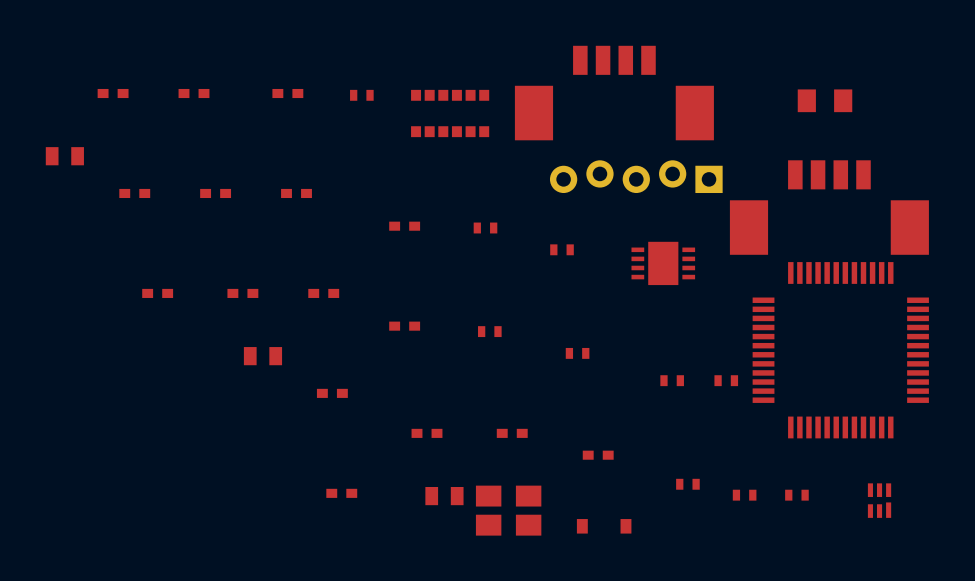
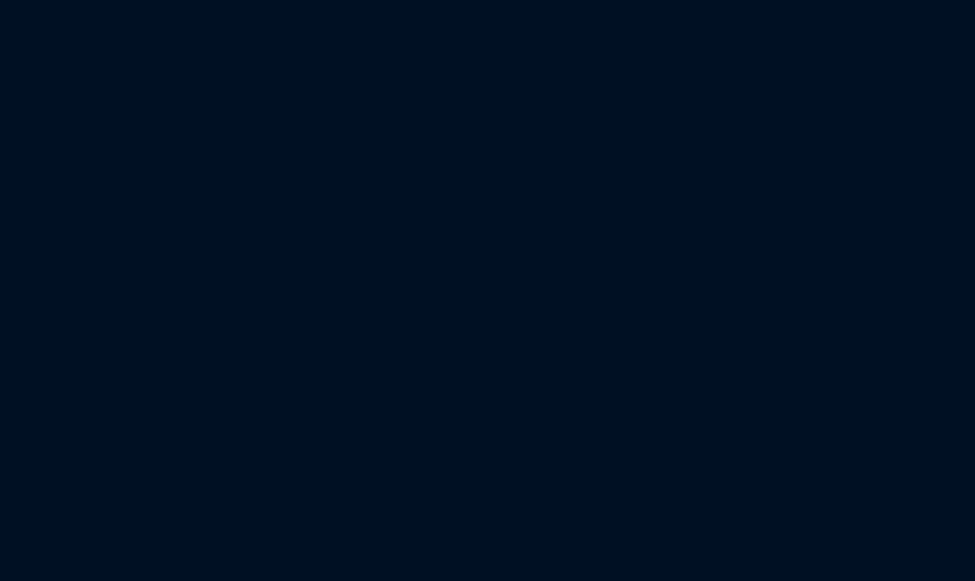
part: (113, 93) -> none
part: (194, 93) -> none
part: (287, 93) -> none
part: (614, 93) -> none
part: (361, 95) -> none
part: (825, 100) -> none
part: (450, 113) -> none
part: (64, 156) -> none
part: (636, 176) -> none
part: (134, 193) -> none
part: (215, 193) -> none
part: (296, 193) -> none
part: (829, 207) -> none
part: (404, 226) -> none
part: (485, 228) -> none
part: (562, 249) -> none
part: (663, 263) -> none
part: (157, 293) -> none
part: (242, 293) -> none
part: (323, 293) -> none
part: (404, 326) -> none
part: (489, 331) -> none
part: (840, 350) -> none
part: (577, 353) -> none
part: (262, 356) -> none
part: (672, 380) -> none
part: (726, 380) -> none
part: (332, 393) -> none
part: (427, 433) -> none
part: (512, 433) -> none
part: (598, 455) -> none
part: (687, 484) -> none
part: (341, 493) -> none
part: (744, 495) -> none
part: (796, 495) -> none
part: (444, 496) -> none
part: (879, 500) -> none
part: (508, 510) -> none
part: (604, 526) -> none

